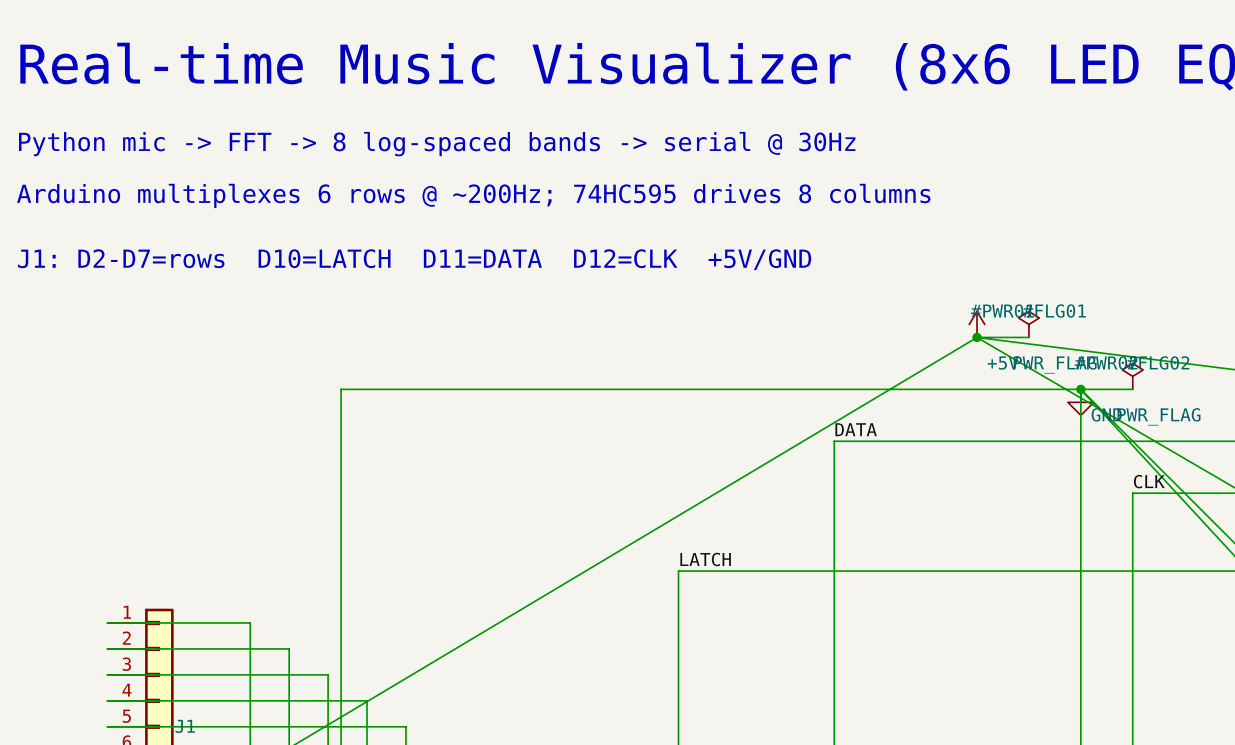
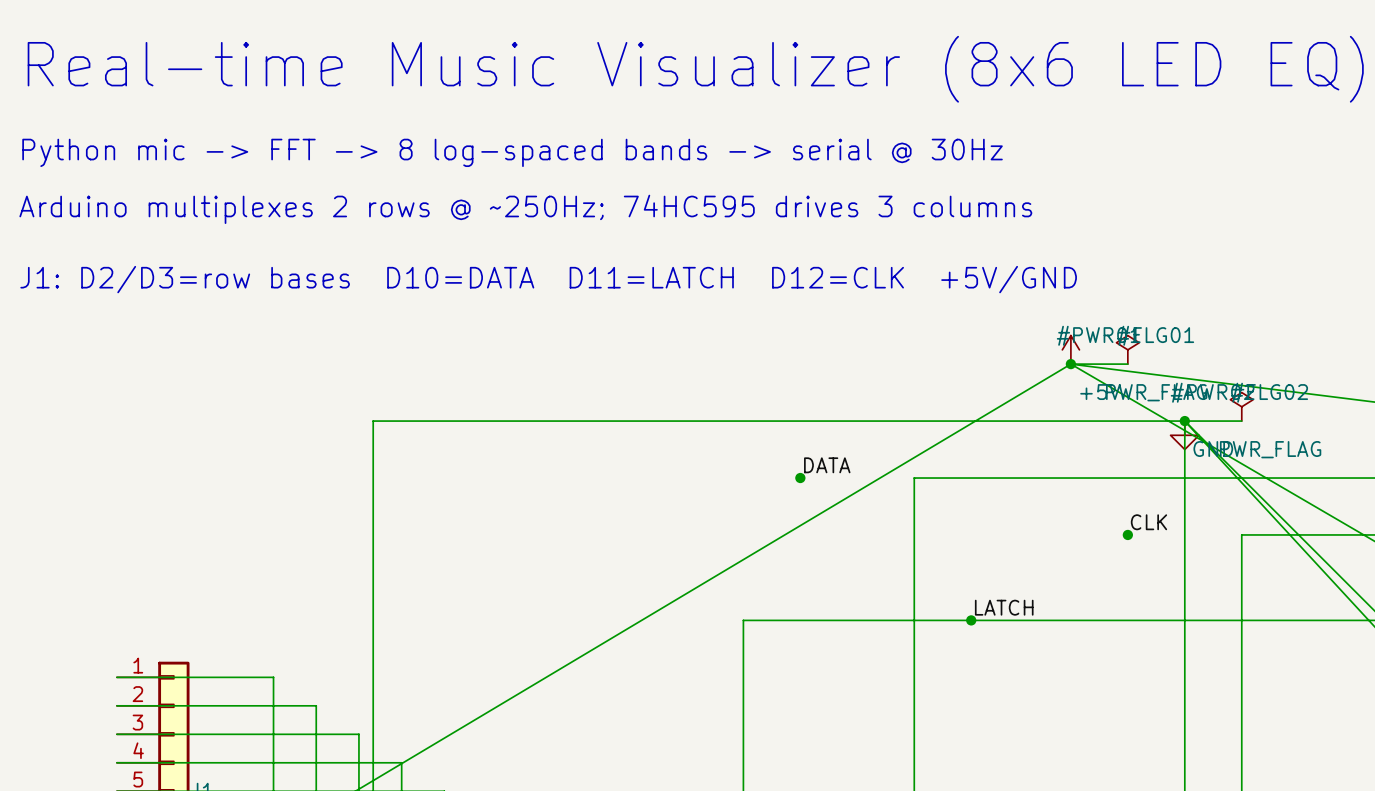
text: Arduino multiplexes 6 rows @ ~200Hz; 74HC595 drives 8 columns (473, 195) -> Arduino multiplexes 2 rows @ ~250Hz; 74HC595 drives 3 columns (525, 209)
text: J1: D2-D7=rows D10=LATCH D11=DATA D12=CLK +5V/GND (414, 259) -> J1: D2/D3=row bases D10=DATA D11=LATCH D12=CLK +5V/GND (548, 279)
label position: DATA (856, 429) -> DATA (827, 465)
junction: none -> (800, 478)
label position: CLK (1149, 481) -> CLK (1148, 522)
junction: none -> (1127, 534)
label position: LATCH (705, 559) -> LATCH (1004, 607)
junction: none -> (971, 620)

